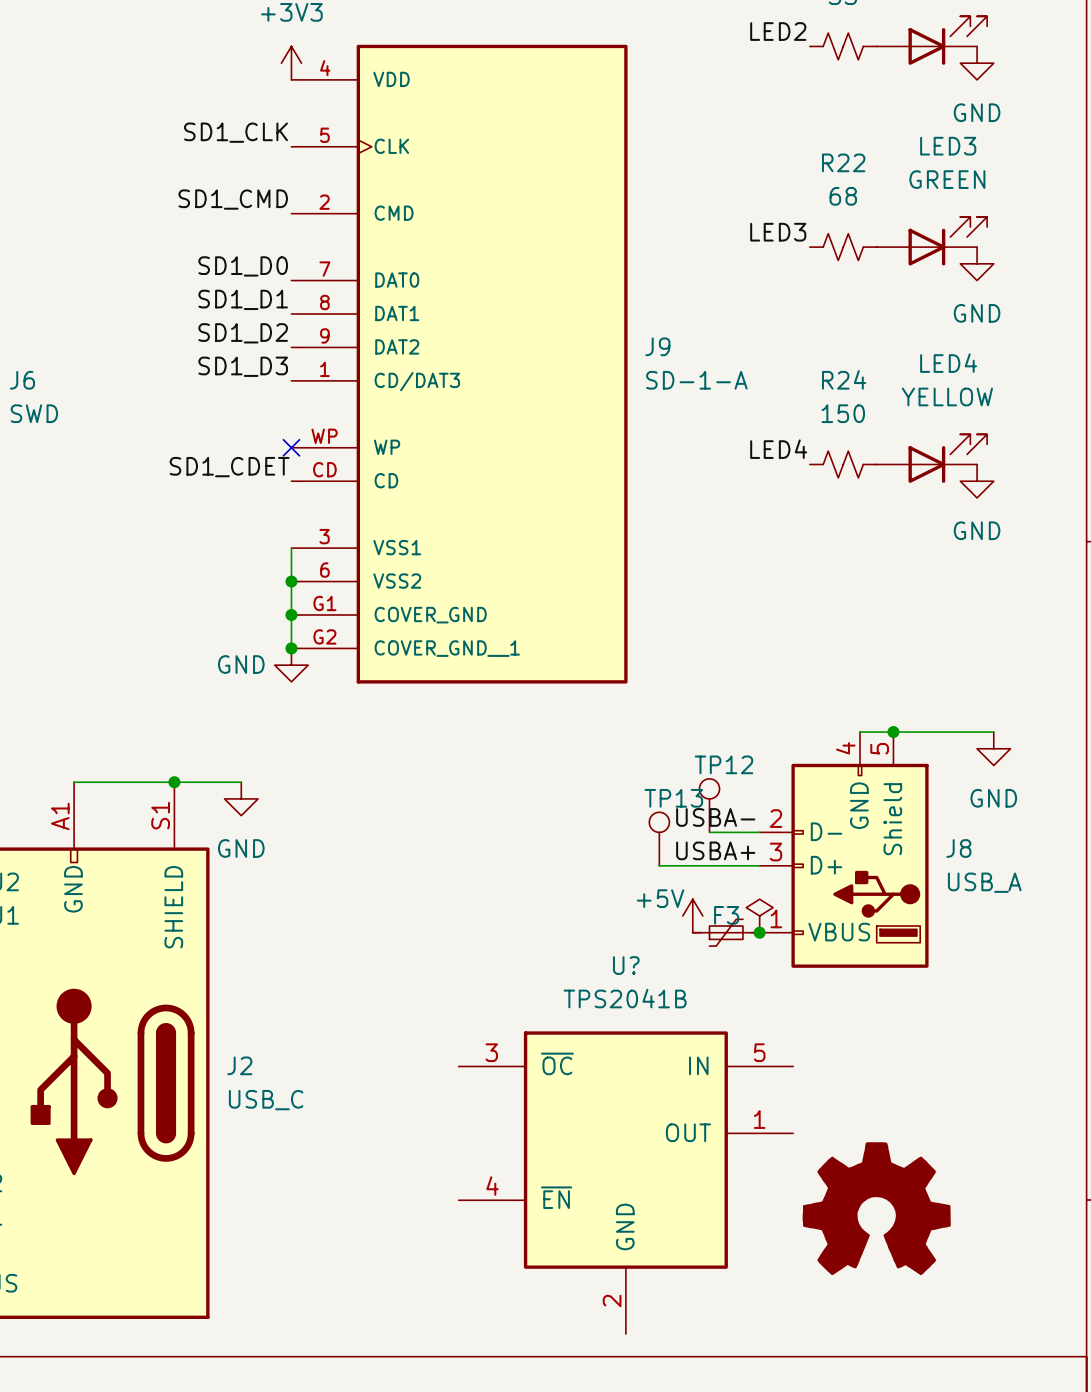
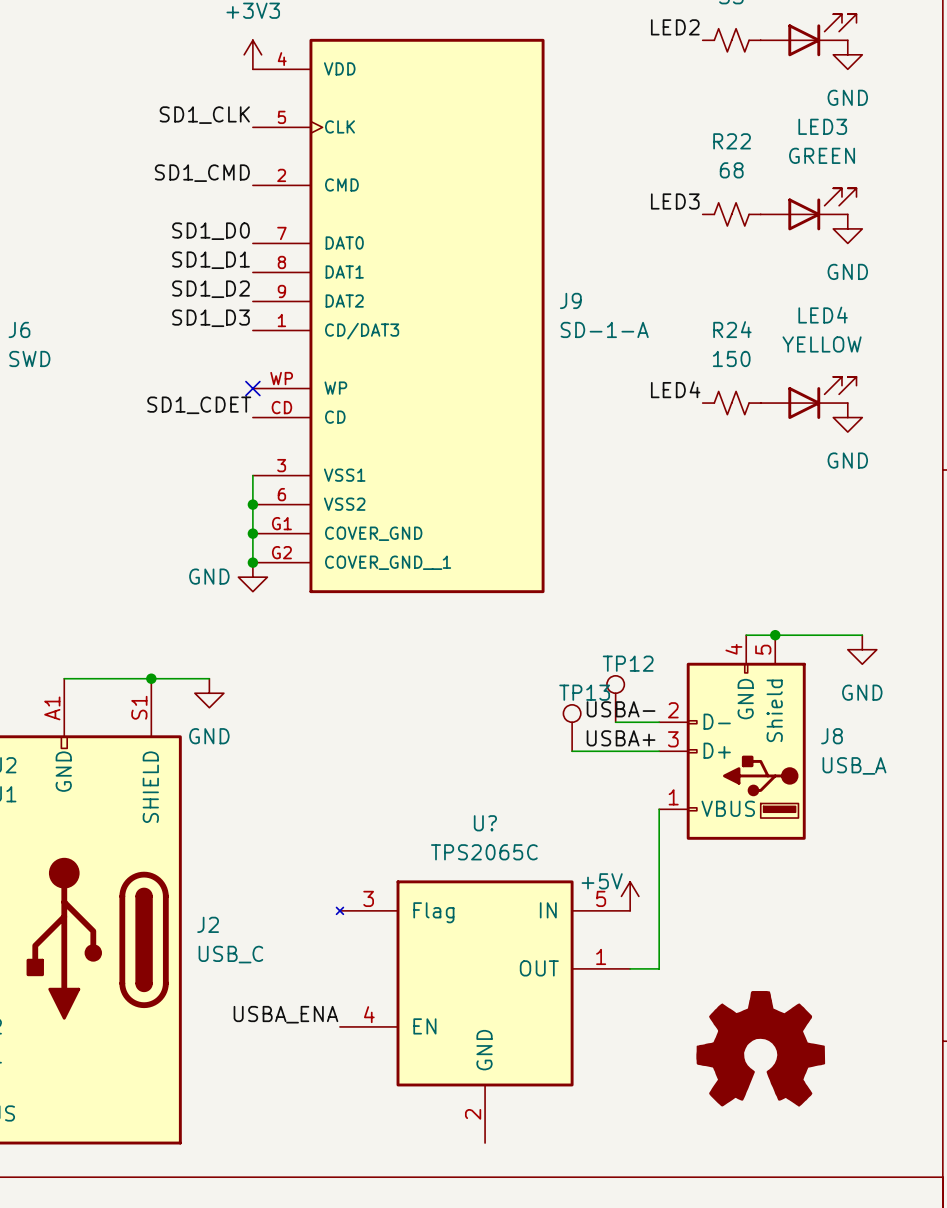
power symbol position: +5V (692, 915) -> +5V (630, 896)
power symbol: (759, 915) -> none
F3: (726, 932) -> none
wire: none -> (659, 809) (659, 968) (630, 968)
junction: (759, 932) -> none
U?: none -> TPS2065C (483, 1011)
label: none -> USBA_ENA (285, 1014)
U?: TPS2041B (625, 1182) -> none

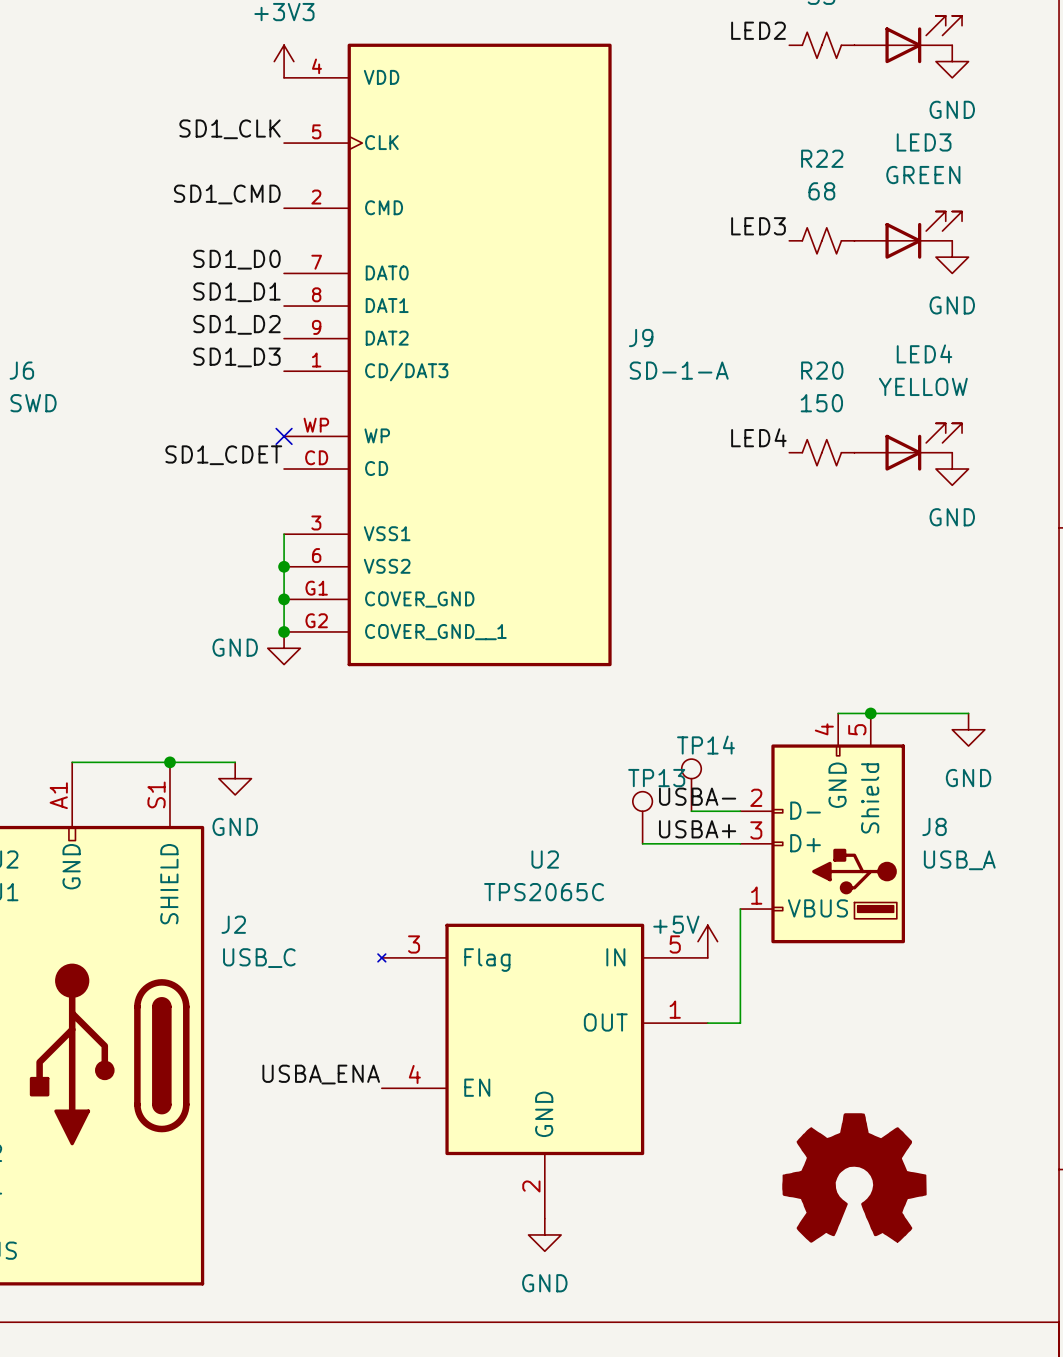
R24 name: R24 (732, 329) -> R20 (822, 370)
TP12 name: TP12 (628, 663) -> TP14 (705, 745)
power symbol position: +5V (630, 896) -> +5V (707, 941)
wire: (659, 910) (659, 968) (630, 968) -> (740, 1023) (707, 1023)
J2 name position: J2 (208, 924) -> J2 (233, 924)
U2: none -> TPS2065C (542, 1071)
J2 value position: USB_C (230, 954) -> USB_C (259, 958)
U?: TPS2065C (483, 1011) -> none
label position: USBA_ENA (285, 1014) -> USBA_ENA (321, 1074)
power symbol: none -> GND (544, 1234)

